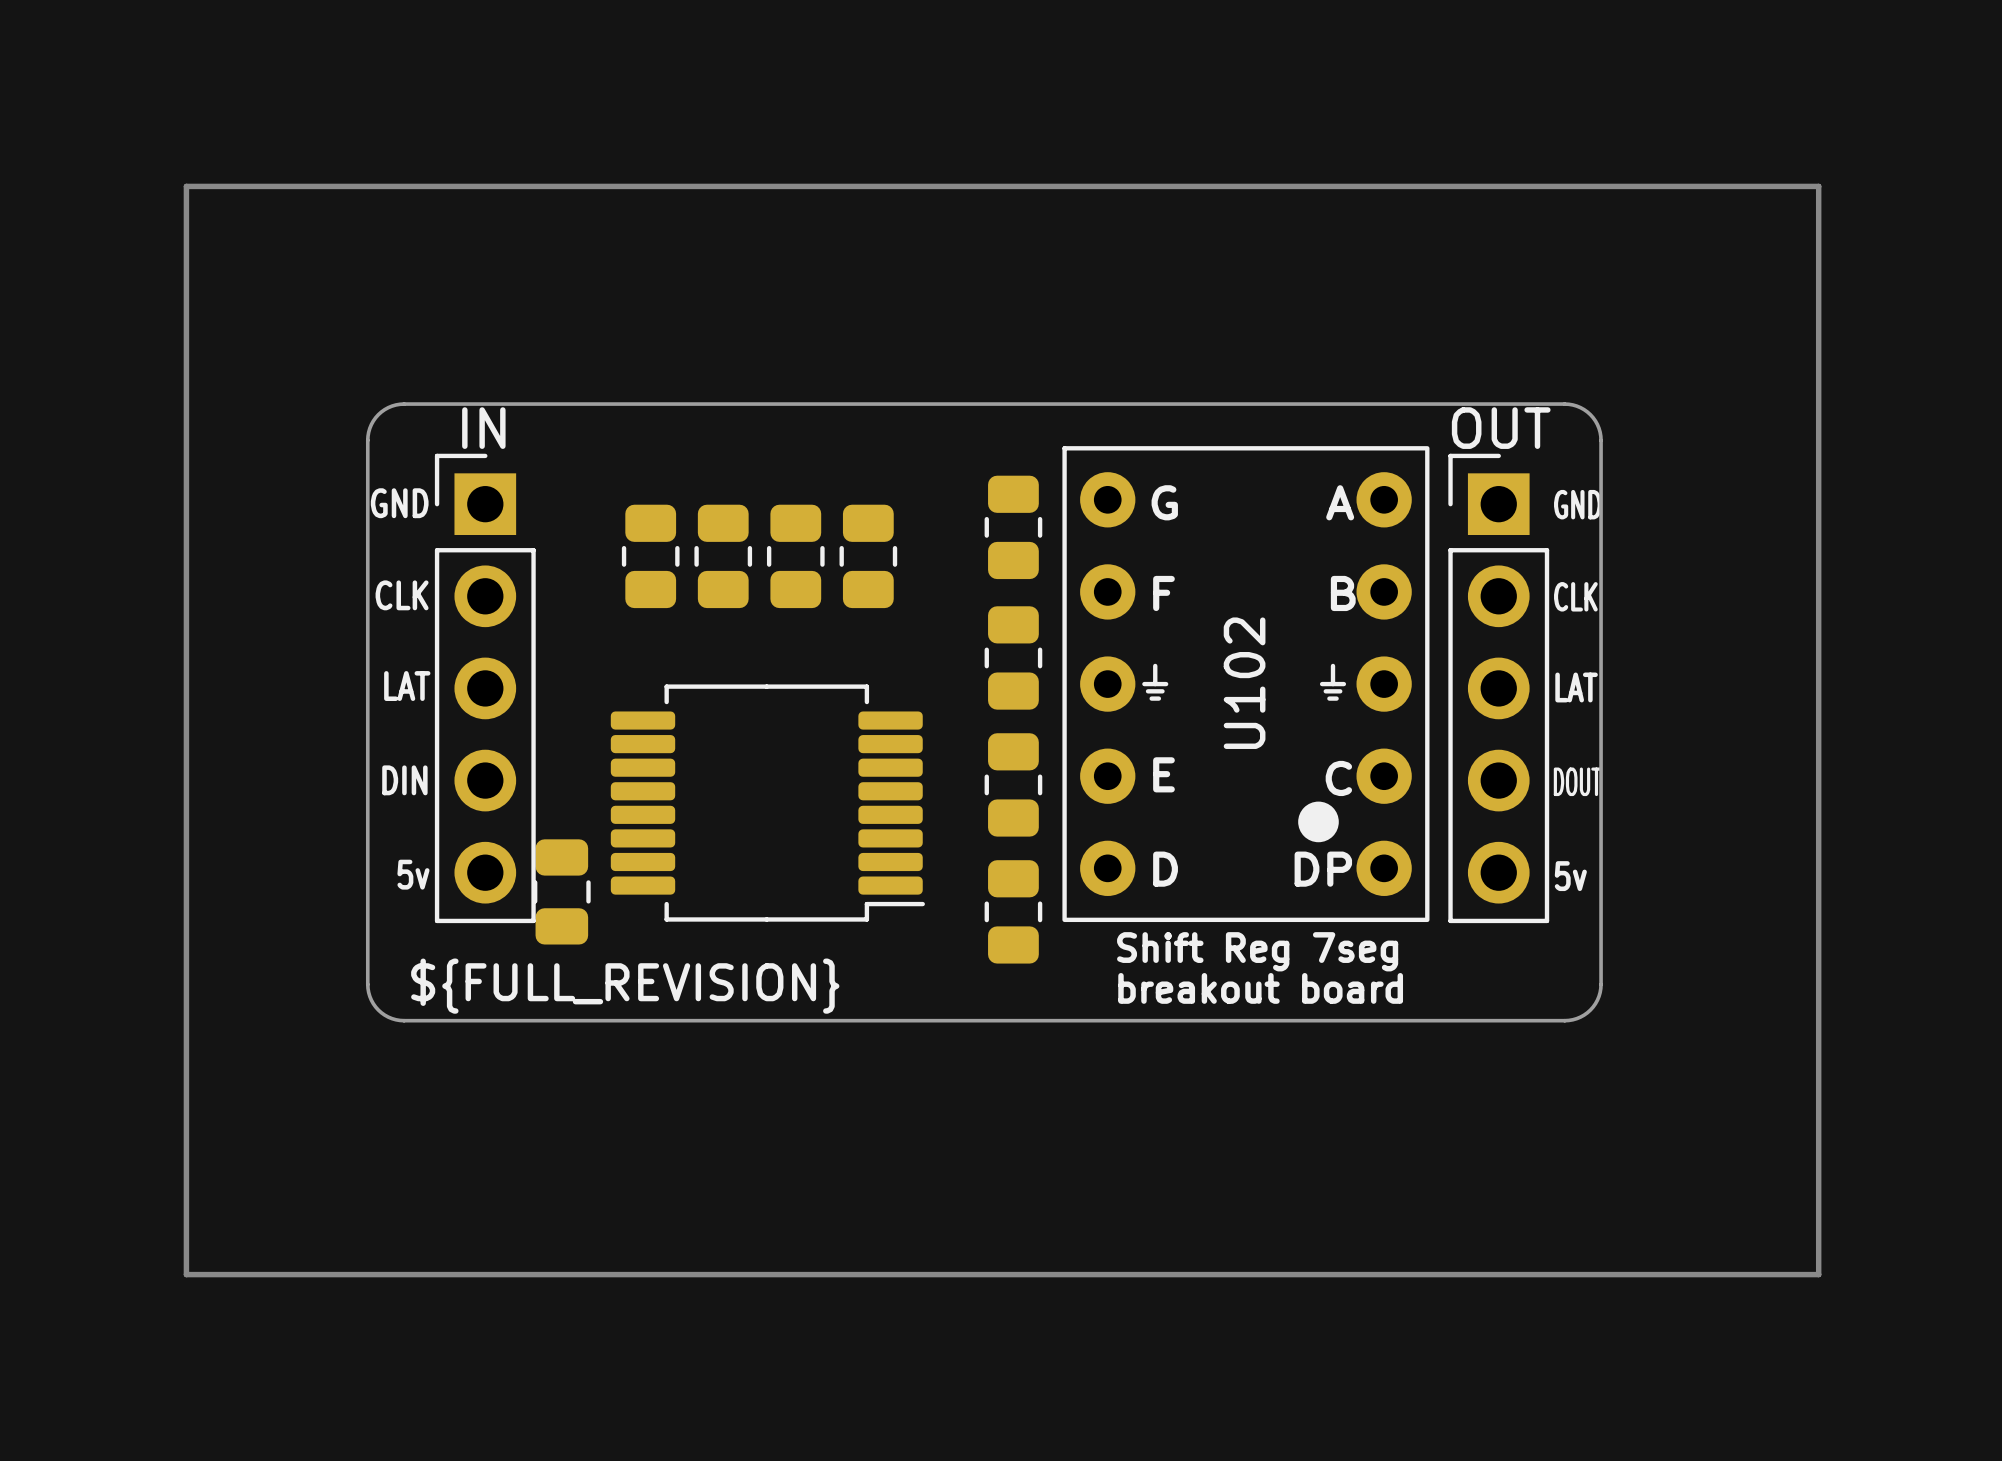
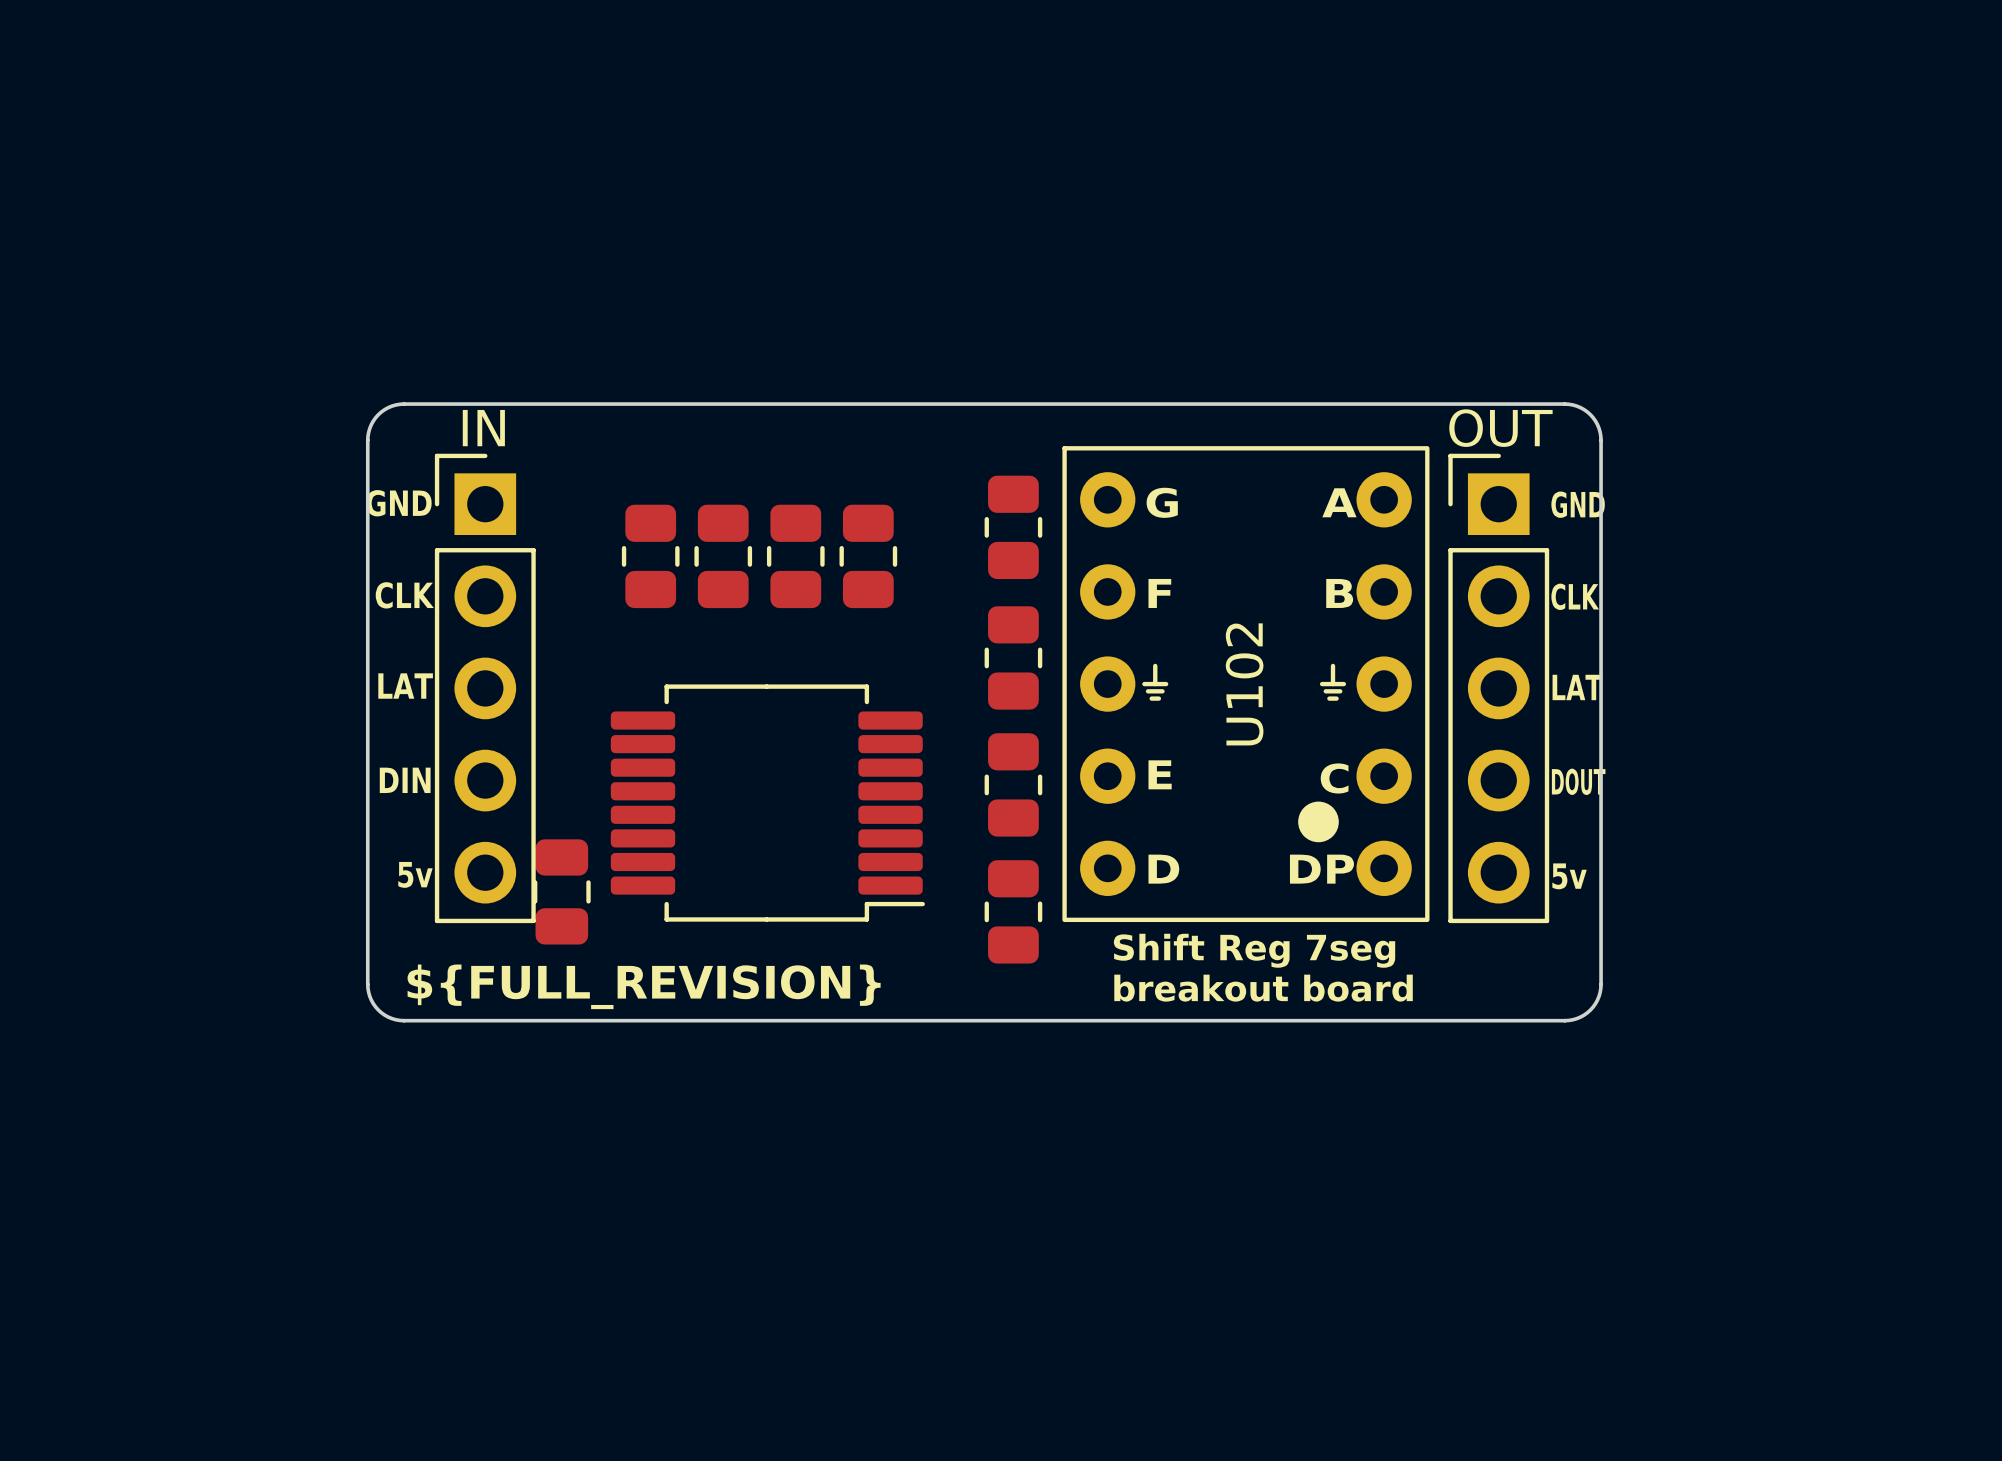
line: (186, 186) (1818, 186) (1818, 1274) (186, 1274) (186, 186) -> none

